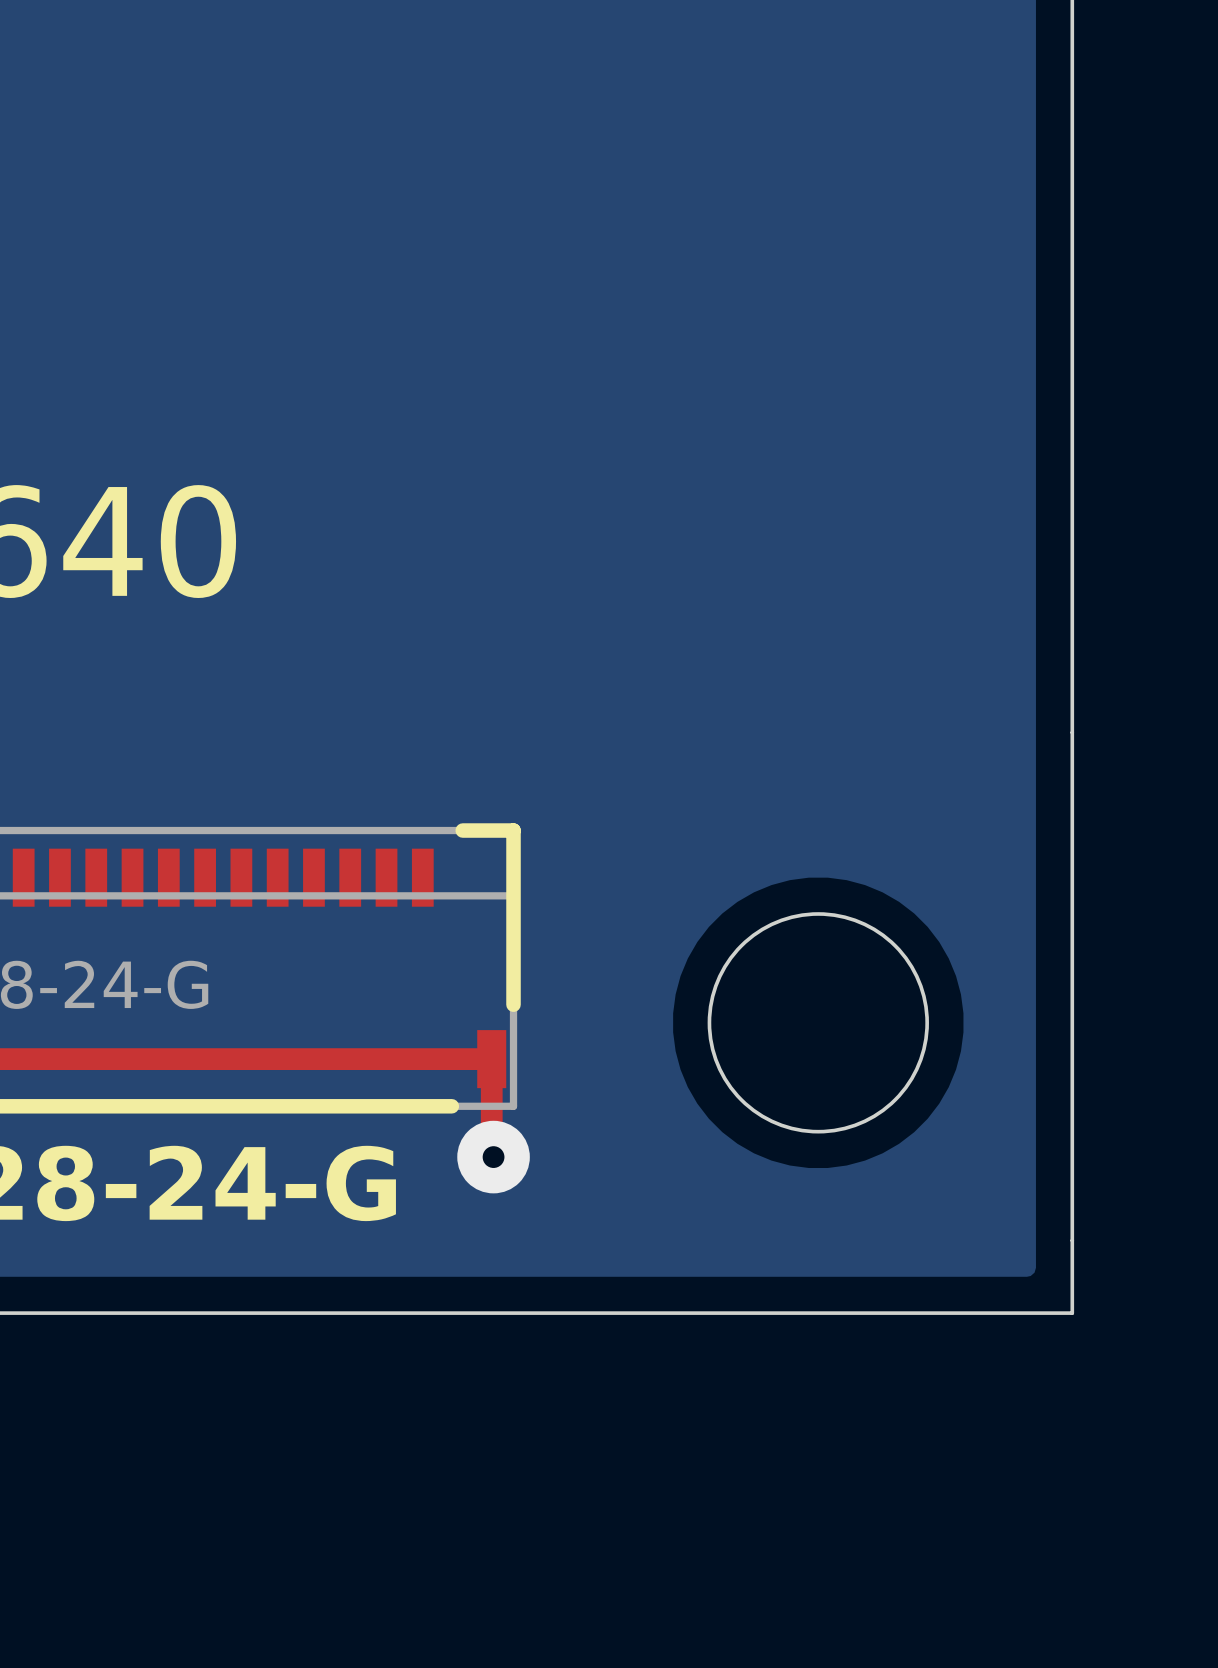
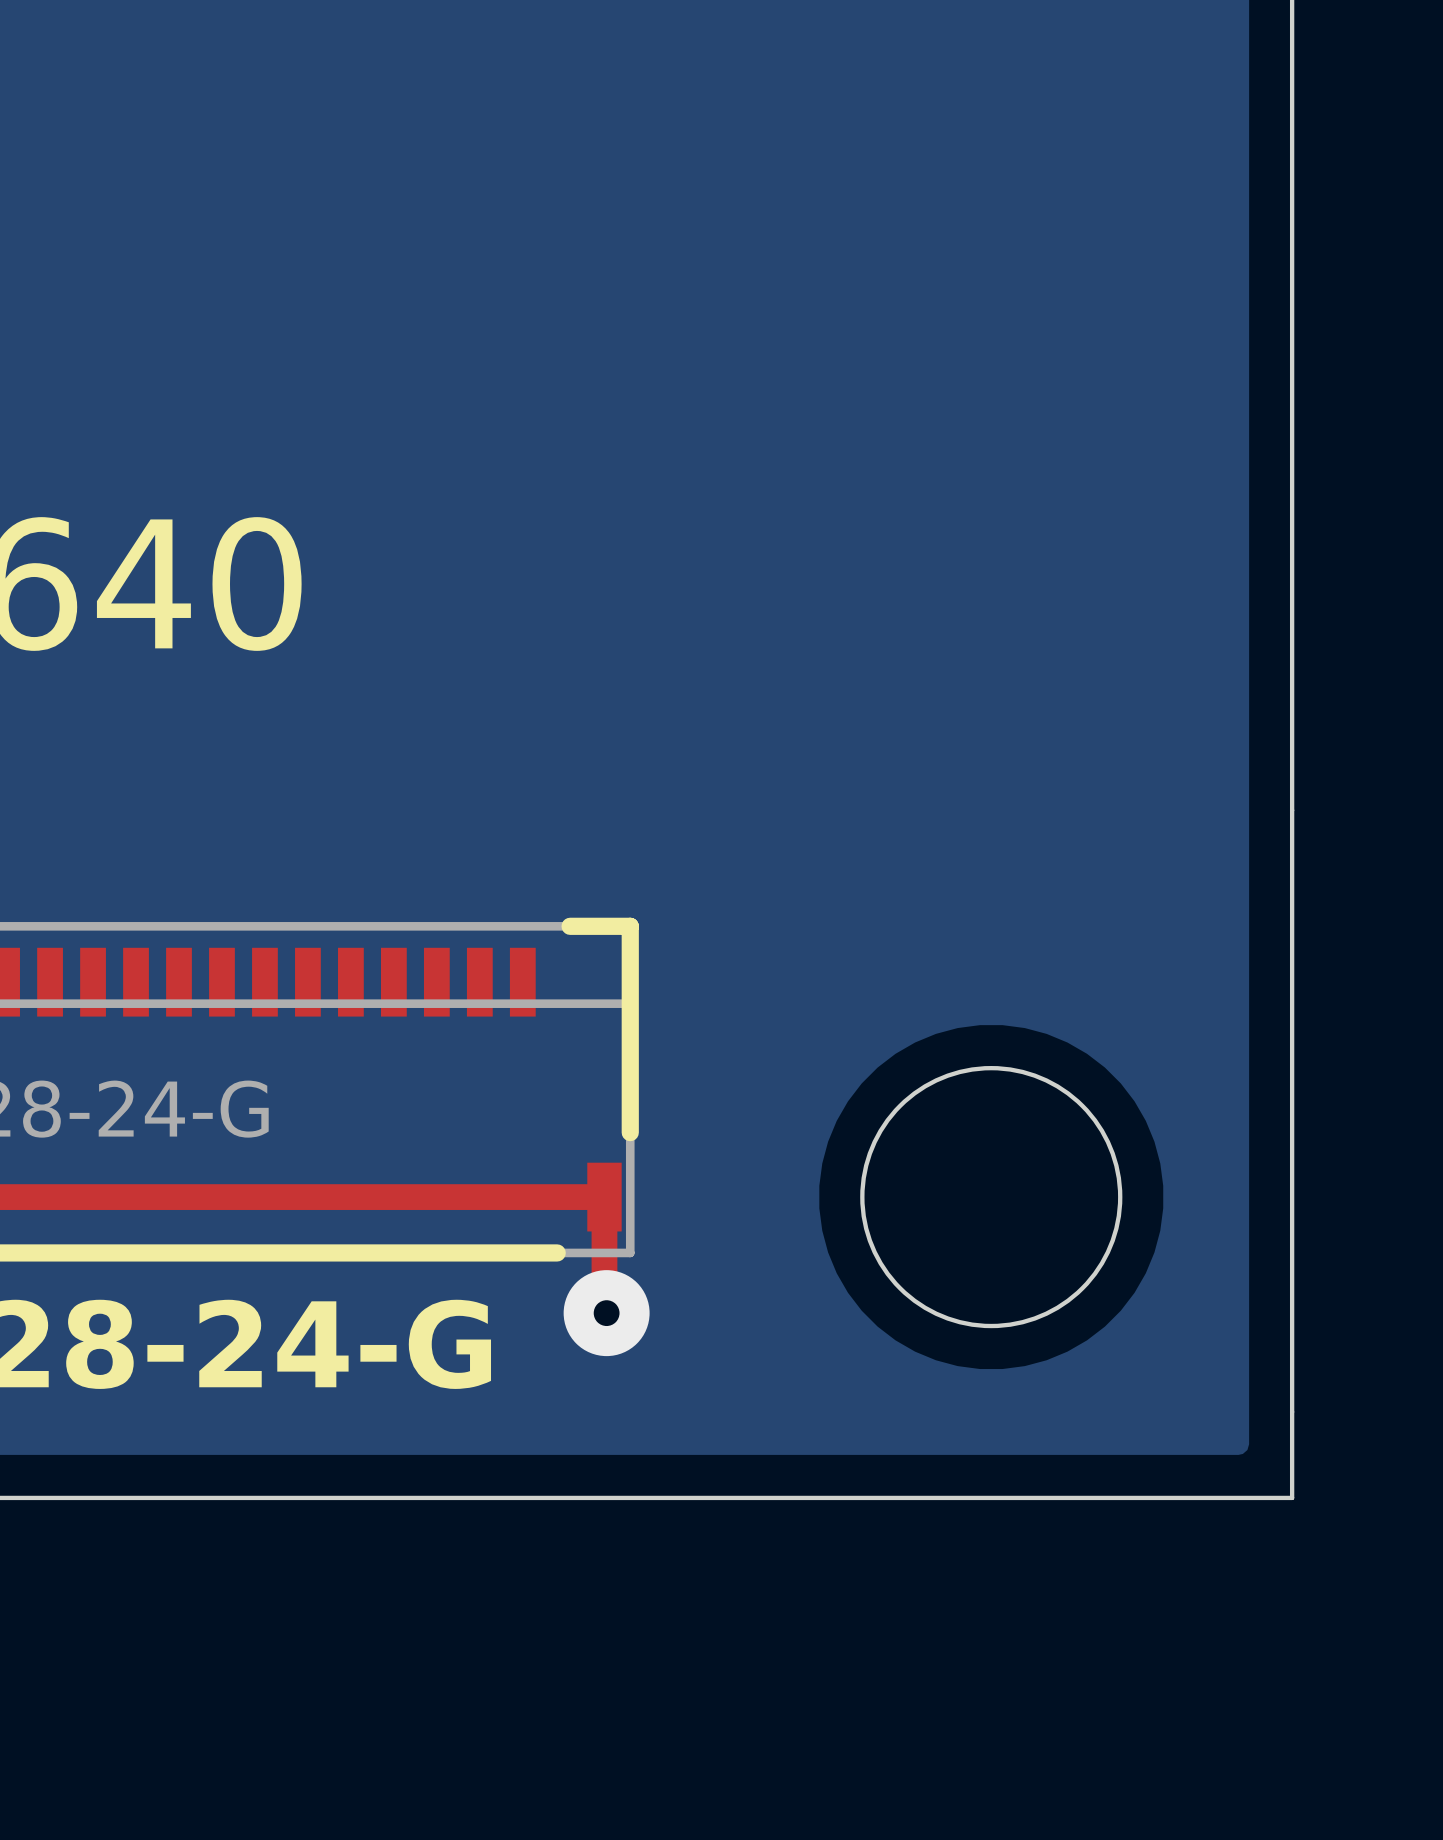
round board edge position: (818, 1022) -> (991, 1197)

